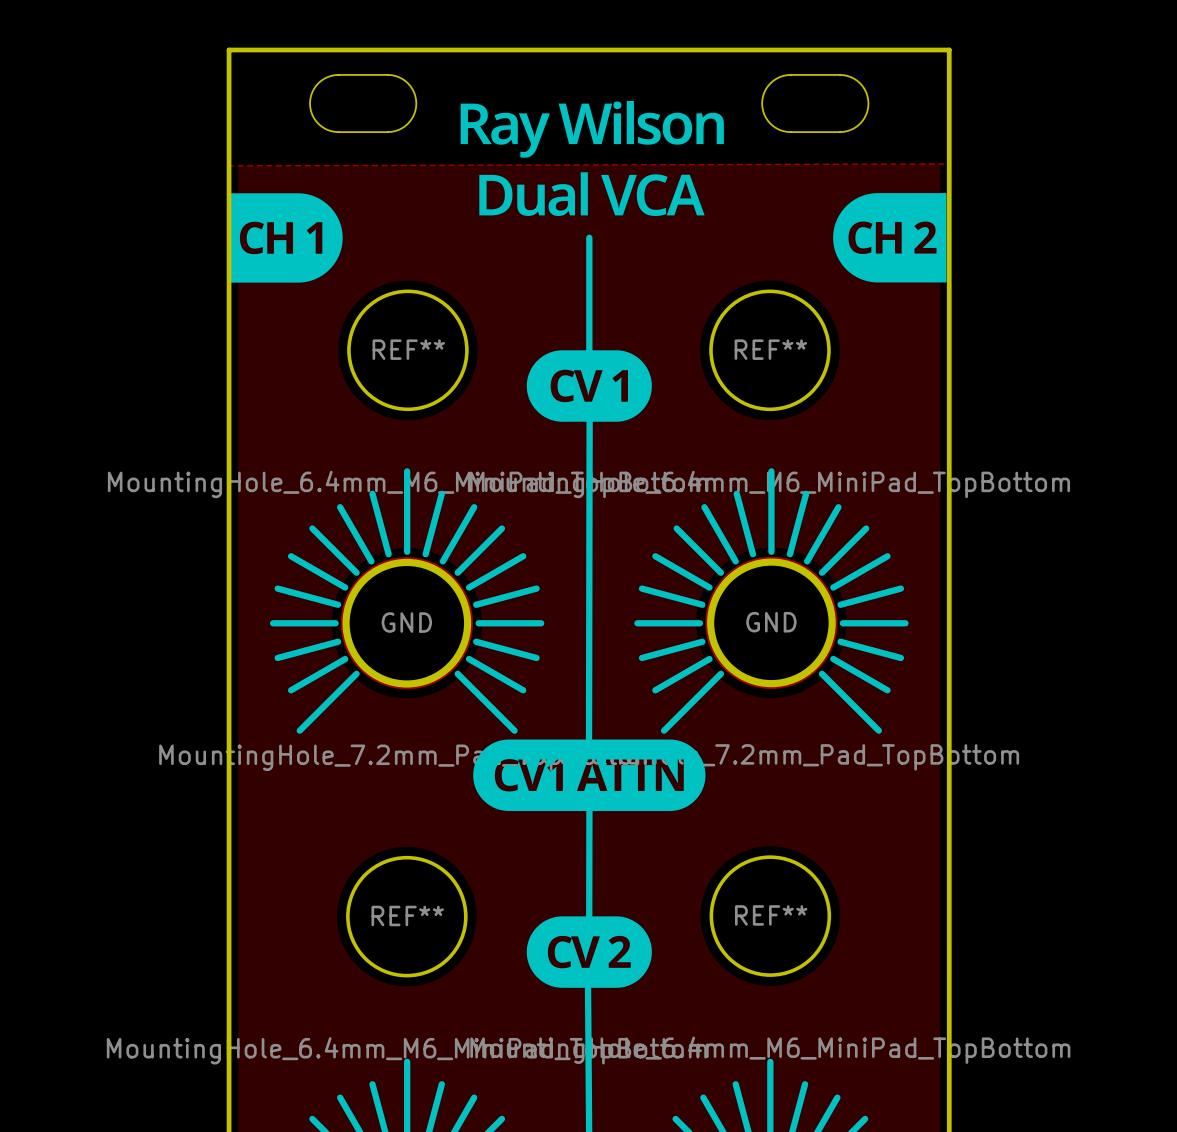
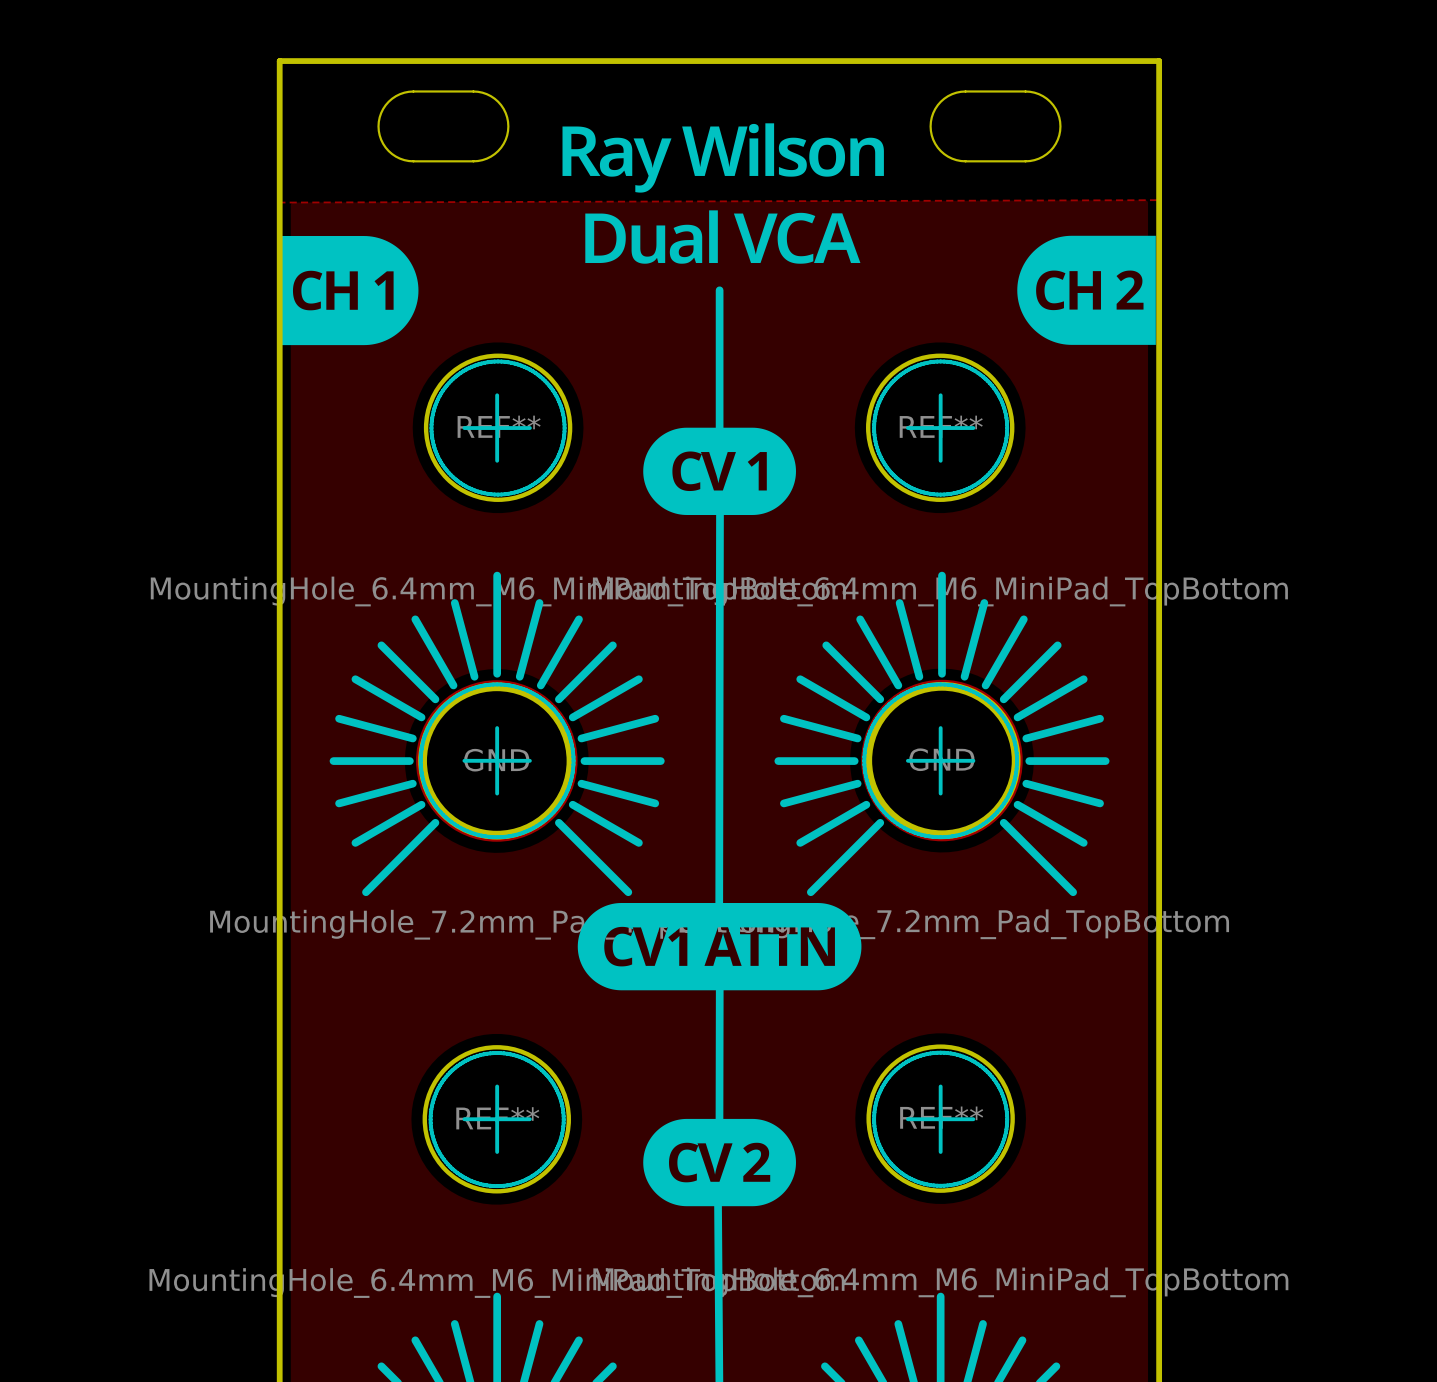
line: none -> (498, 361) (523, 366) (545, 380) (559, 402) (564, 428) (559, 453) (545, 475) (523, 489) (498, 494) (472, 489) (450, 475) (436, 453) (431, 428) (436, 402) (450, 380) (472, 366) (498, 361)
line: none -> (940, 361) (914, 366) (893, 380) (879, 402) (874, 428) (879, 453) (893, 475) (914, 489) (940, 494) (966, 489) (987, 475) (1001, 453) (1007, 428) (1001, 402) (987, 380) (966, 366) (940, 361)
line: none -> (497, 395) (497, 460)
line: none -> (940, 395) (940, 460)
line: none -> (464, 428) (529, 428)
line: none -> (907, 428) (973, 428)
line: none -> (497, 684) (481, 685) (467, 690) (443, 706) (426, 731) (422, 745) (420, 760) (422, 776) (426, 790) (443, 814) (467, 831) (481, 835) (497, 837) (512, 835) (526, 831) (551, 814) (567, 790) (571, 776) (573, 760) (571, 745) (567, 731) (551, 706) (526, 690) (512, 685) (497, 684)
line: none -> (940, 684) (925, 685) (910, 690) (886, 706) (870, 731) (865, 745) (864, 760) (865, 776) (870, 790) (886, 814) (910, 831) (925, 835) (940, 837) (956, 835) (970, 831) (994, 814) (1011, 790) (1015, 776) (1017, 760) (1015, 745) (1011, 731) (994, 706) (970, 690) (956, 685) (940, 684)
line: none -> (497, 728) (497, 793)
line: none -> (940, 728) (940, 793)
line: none -> (464, 760) (529, 760)
line: none -> (907, 760) (973, 760)
line: none -> (497, 1053) (523, 1058) (544, 1072) (558, 1093) (563, 1119) (558, 1145) (544, 1166) (523, 1180) (497, 1186) (471, 1180) (450, 1166) (435, 1145) (430, 1119) (435, 1093) (450, 1072) (471, 1058) (497, 1053)
line: none -> (937, 1052) (911, 1059) (891, 1074) (878, 1096) (874, 1122) (880, 1148) (895, 1168) (917, 1181) (944, 1185) (969, 1179) (989, 1163) (1003, 1142) (1007, 1115) (1000, 1090) (985, 1069) (963, 1056) (937, 1052)
line: none -> (497, 1086) (497, 1151)
line: none -> (940, 1086) (940, 1151)
line: none -> (464, 1119) (529, 1119)
line: none -> (907, 1119) (973, 1119)

